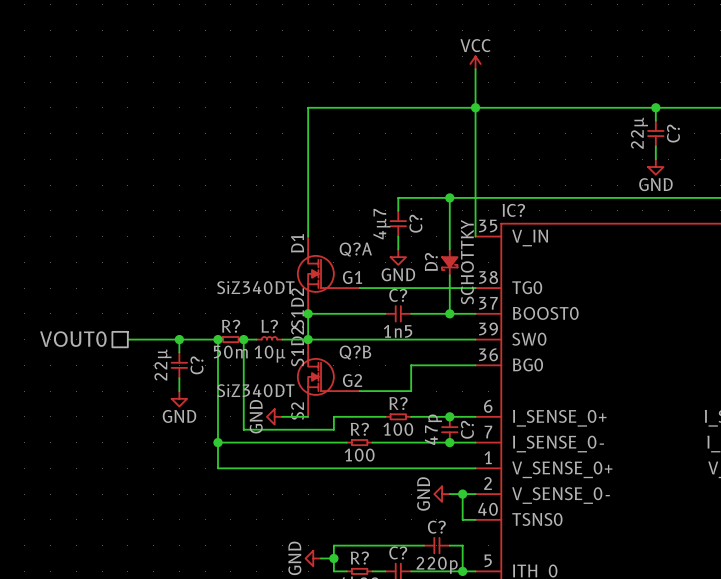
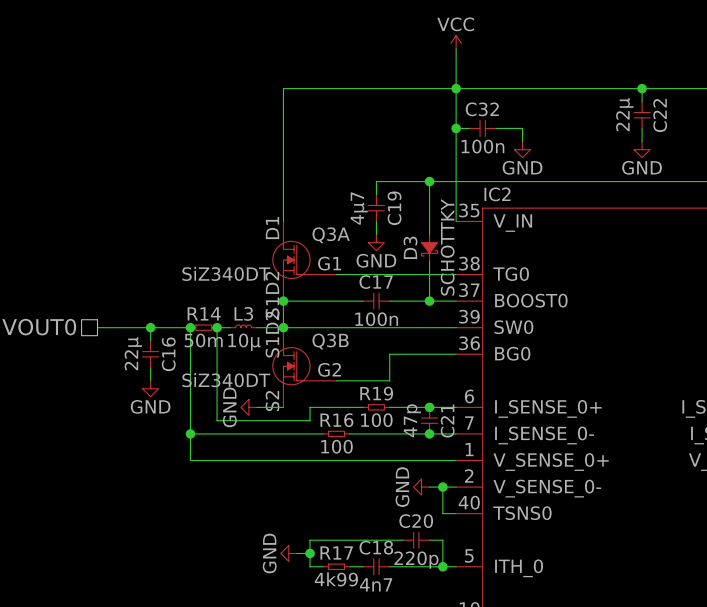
C? name: C? (673, 133) -> C22 (660, 115)
wire: none -> (456, 128) (469, 128)
junction: none -> (456, 128)
C32: none -> 100n (482, 128)
wire: none -> (495, 128) (522, 128) (522, 141)
power symbol: none -> GND (522, 149)
IC? name: IC? (513, 210) -> IC2 (497, 194)
C? name: C? (415, 223) -> C19 (394, 208)
Q?A name: Q?A (355, 249) -> Q3A (331, 235)
D? name: D? (431, 262) -> D3 (410, 247)
C? name: C? (398, 295) -> C17 (376, 282)
R? name: R? (231, 326) -> R14 (204, 313)
L? name: L? (269, 326) -> L3 (243, 313)
C? value: 1n5 (398, 331) -> 100n (376, 319)
Q?B name: Q?B (355, 352) -> Q3B (330, 341)
C? name: C? (196, 365) -> C16 (168, 354)
R? name: R? (398, 403) -> R19 (376, 393)
R? name: R? (359, 429) -> R16 (336, 420)
C? name: C? (467, 429) -> C21 (447, 420)
C? name: C? (436, 527) -> C20 (416, 521)
C? name: C? (398, 552) -> C18 (376, 547)
R? name: R? (359, 558) -> R17 (336, 552)

